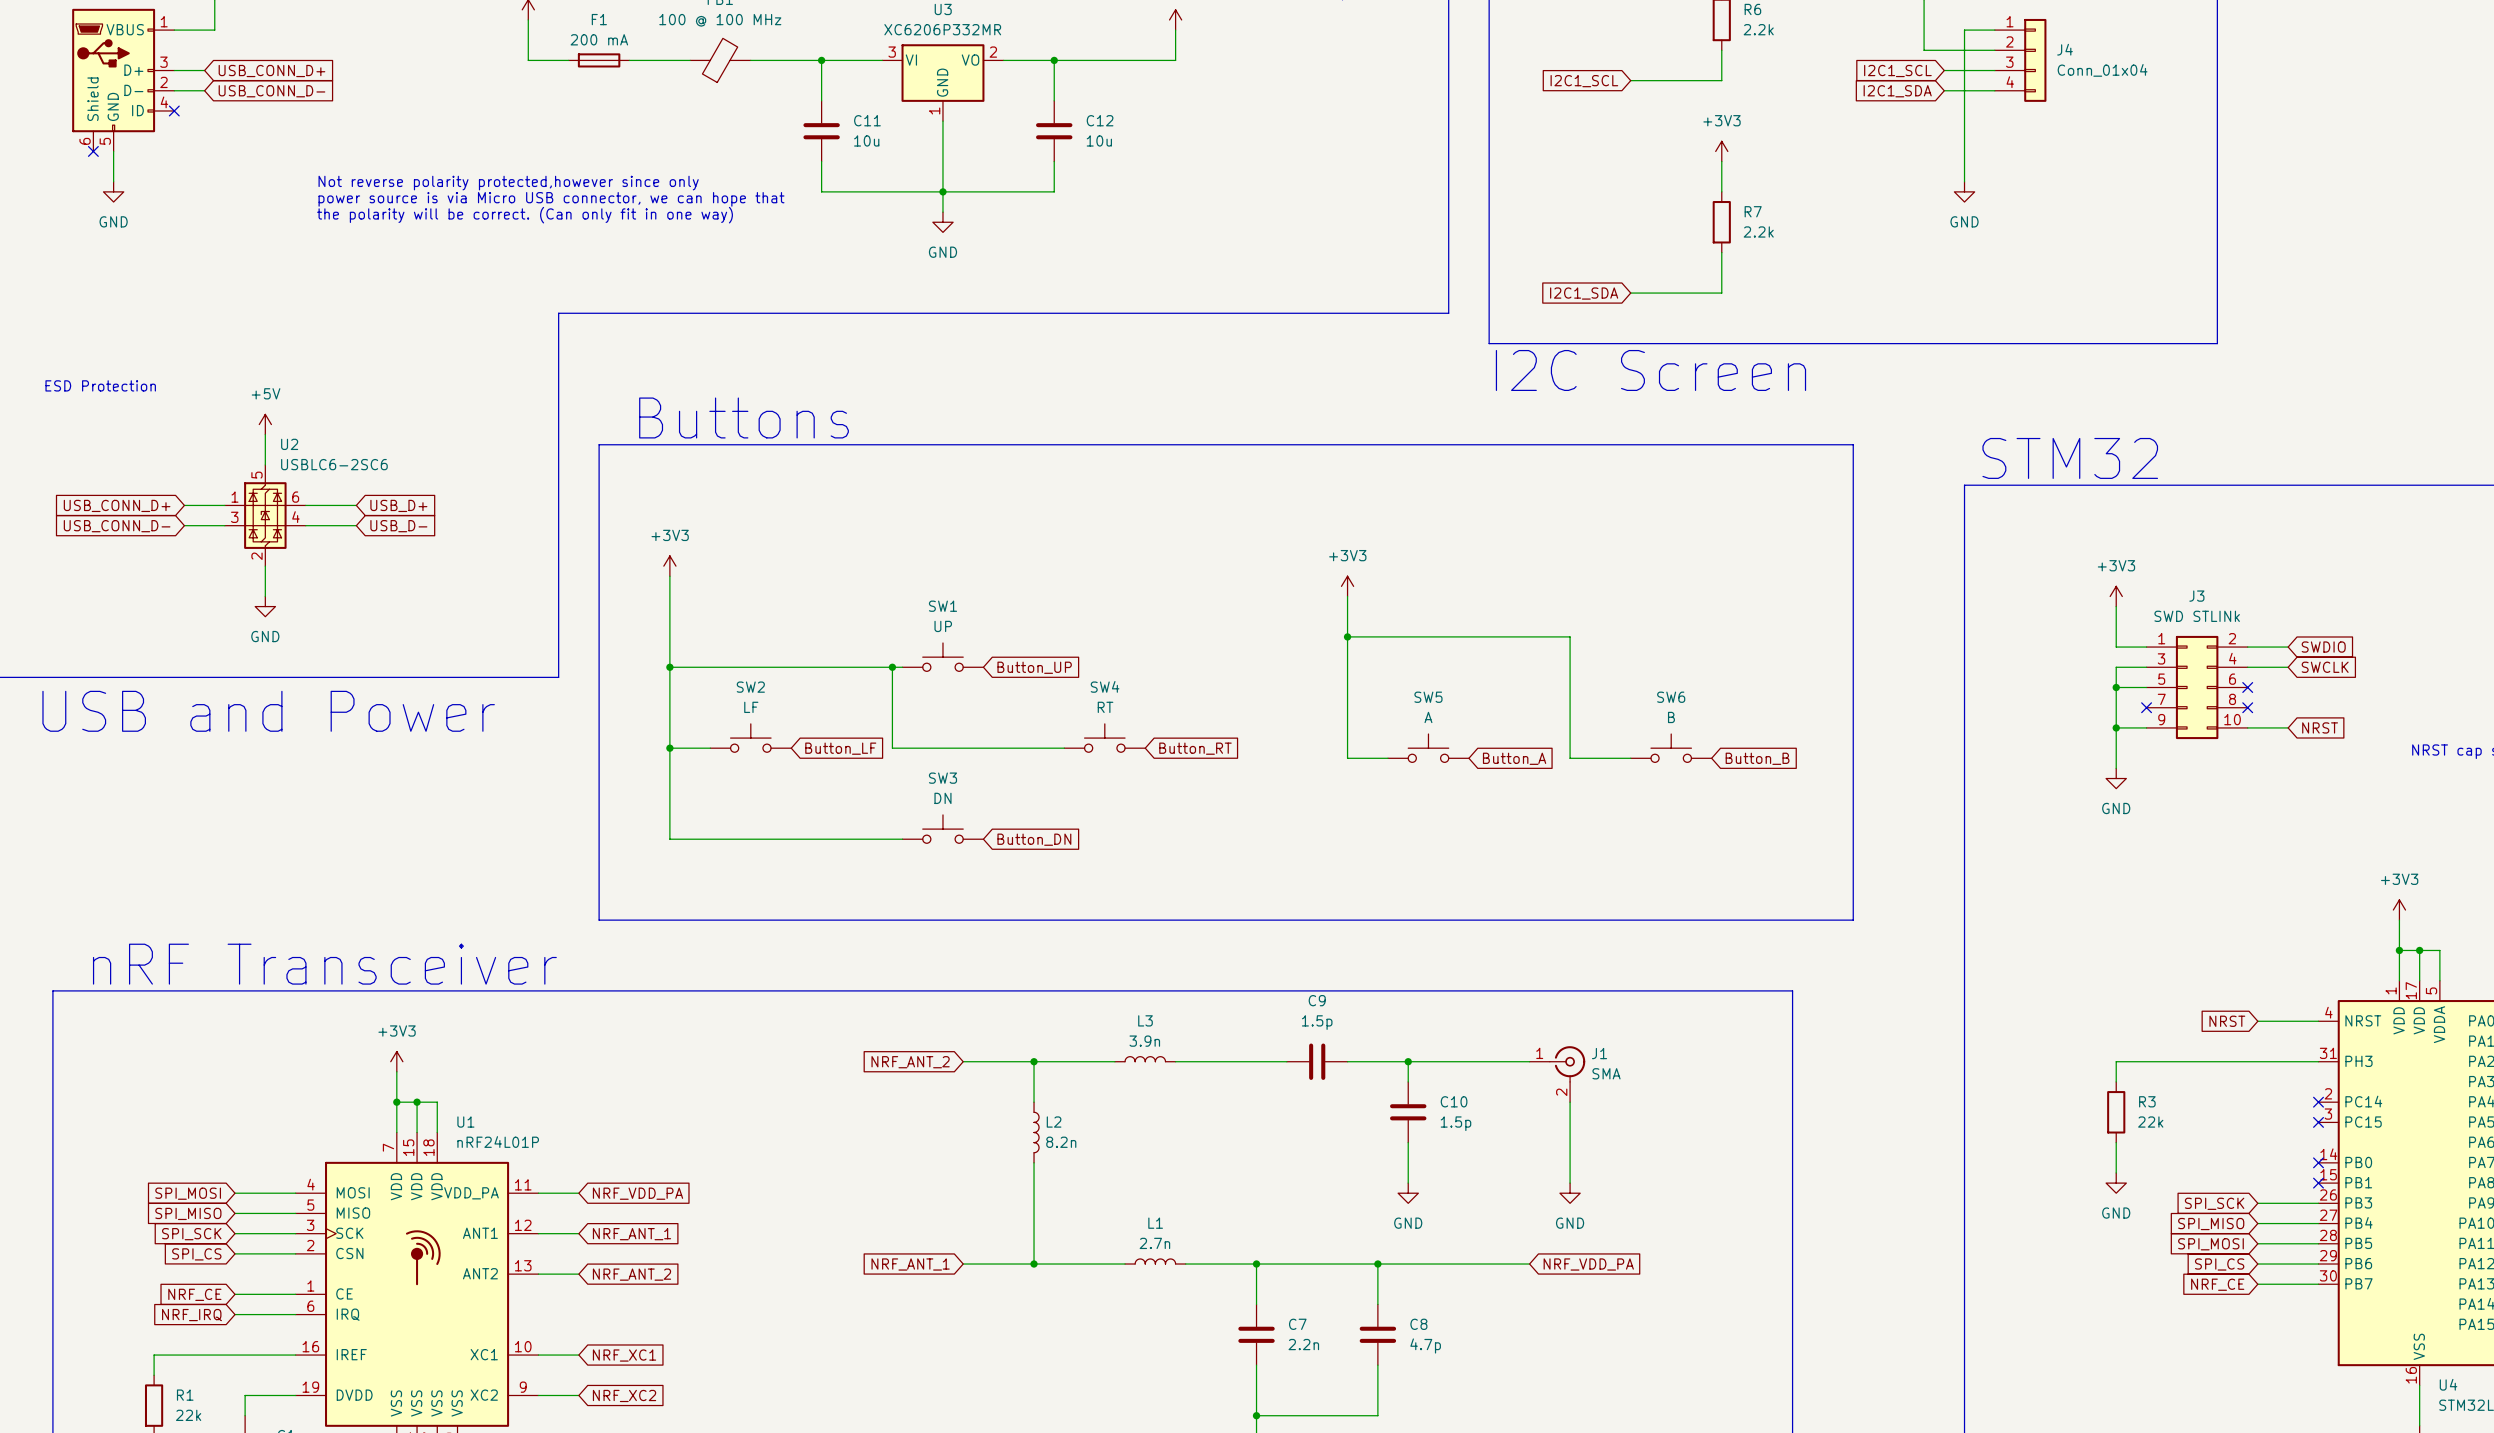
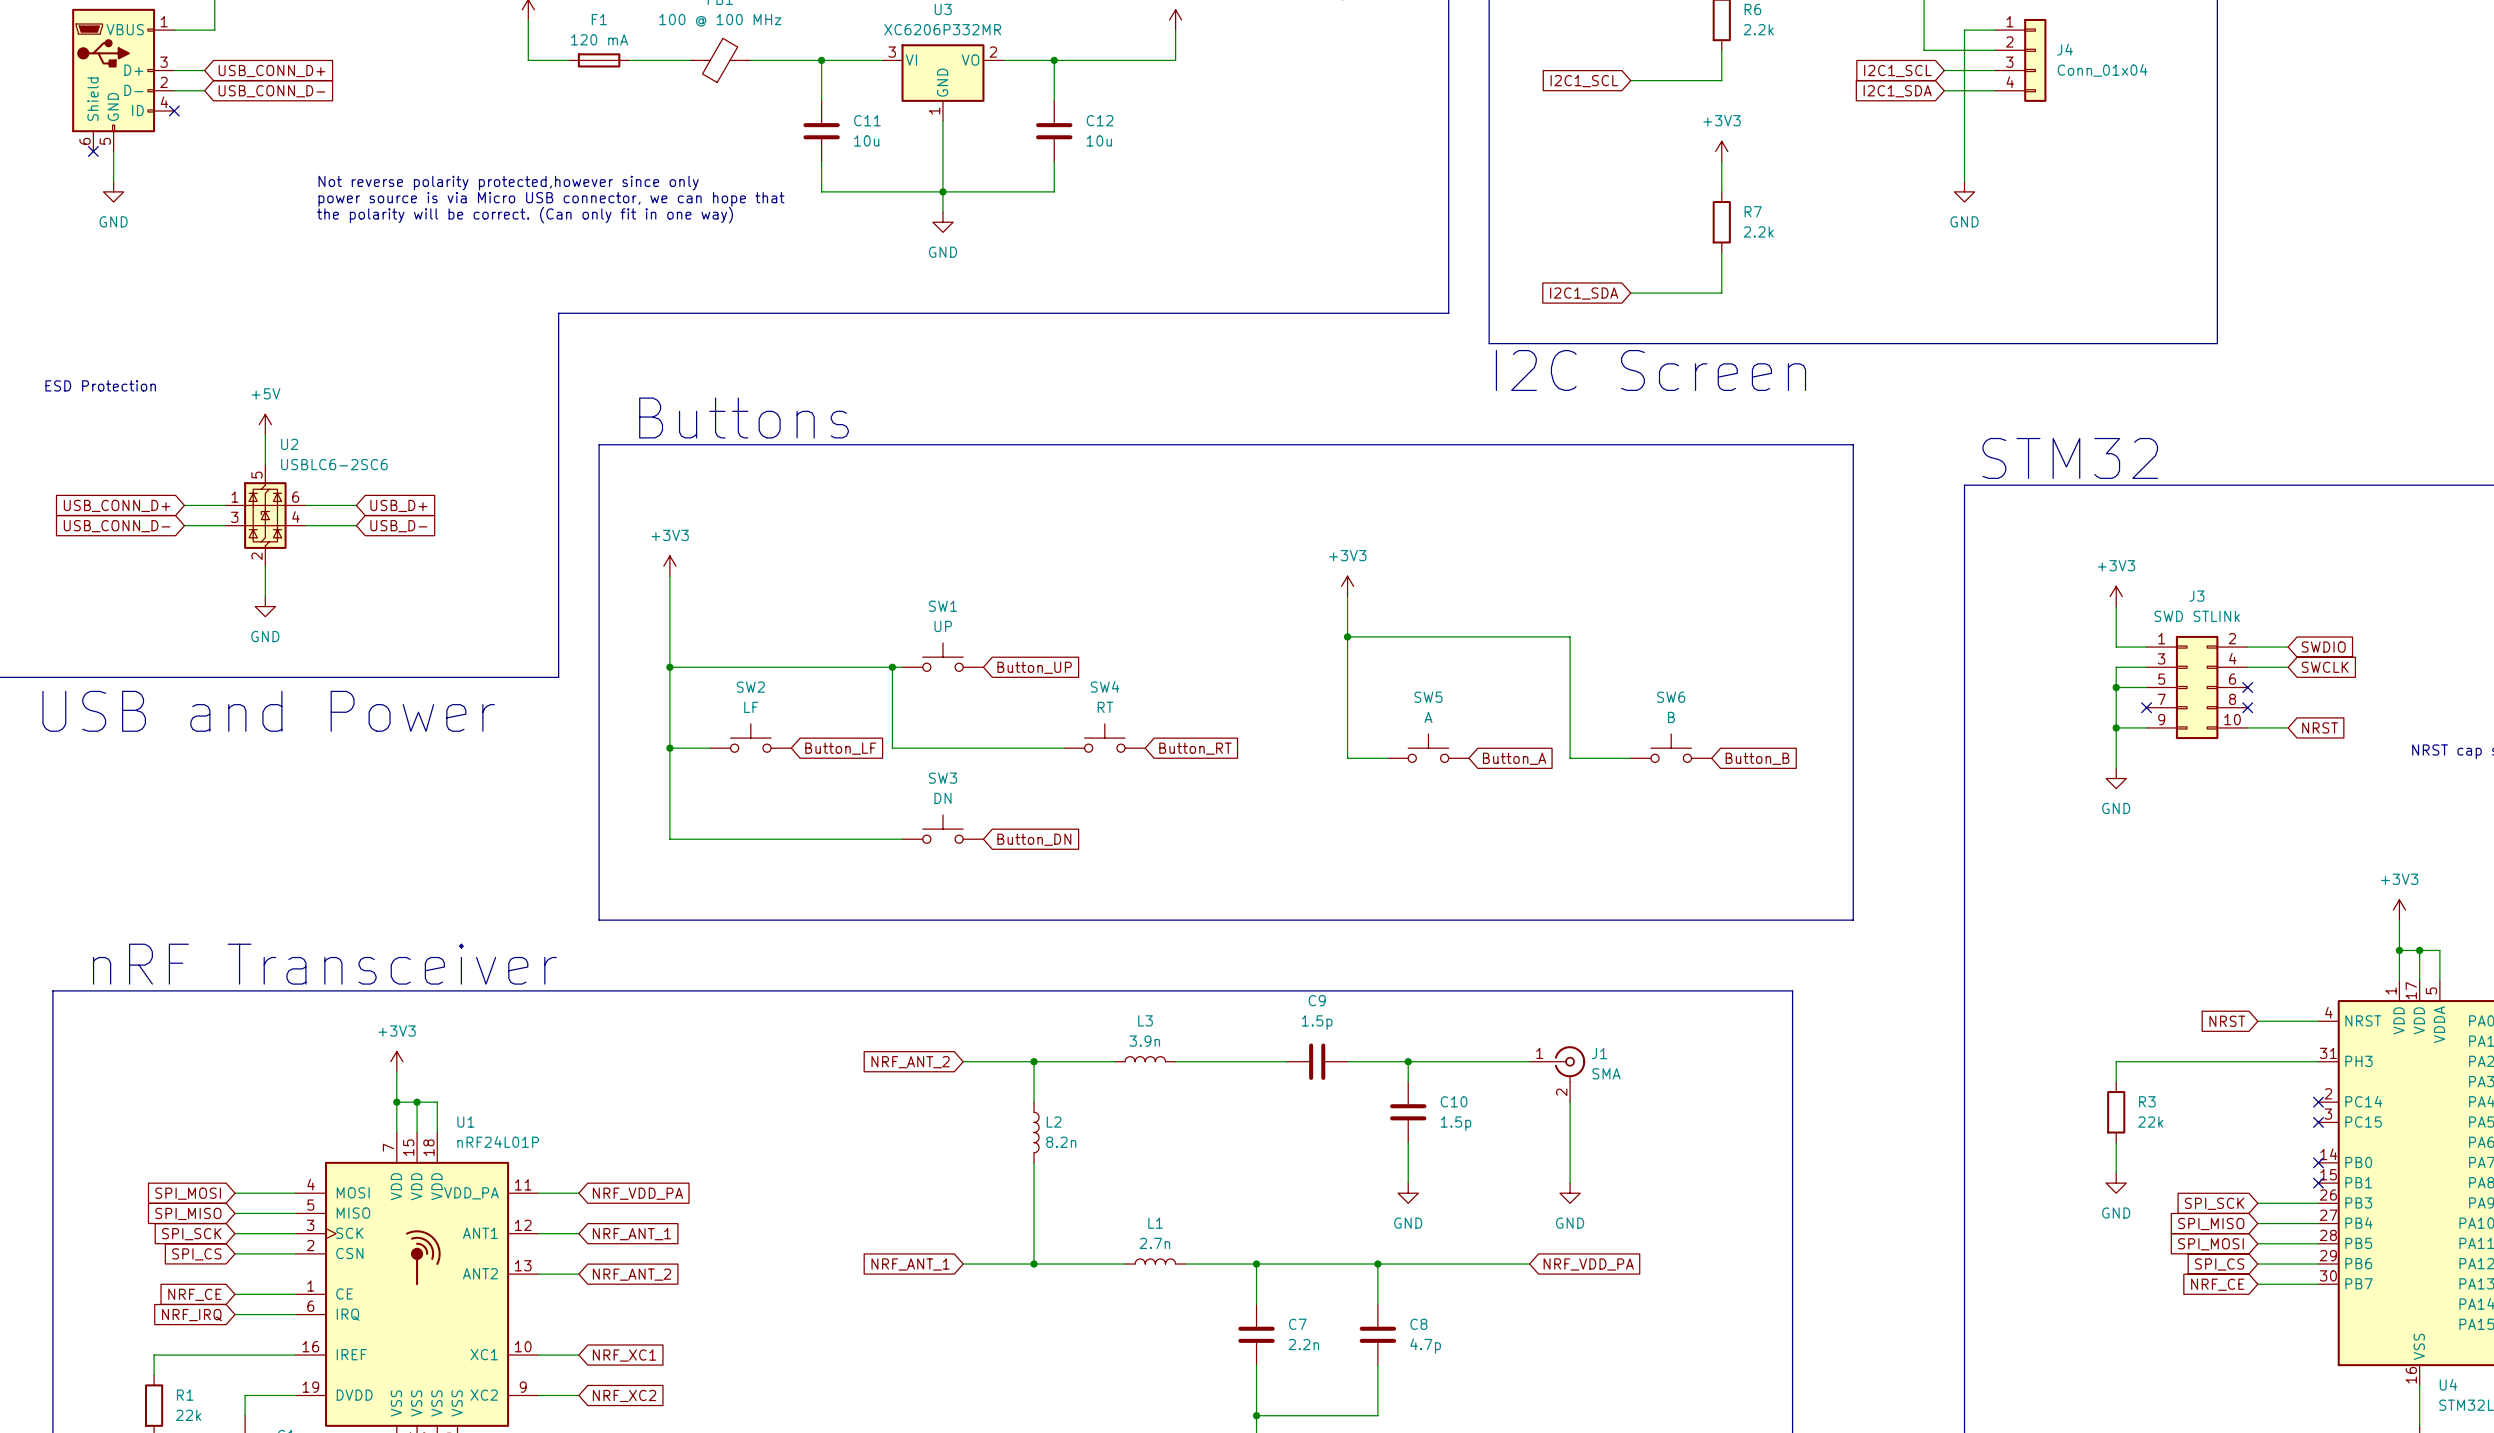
F1 value: 200 mA (599, 39) -> 120 mA (599, 39)

